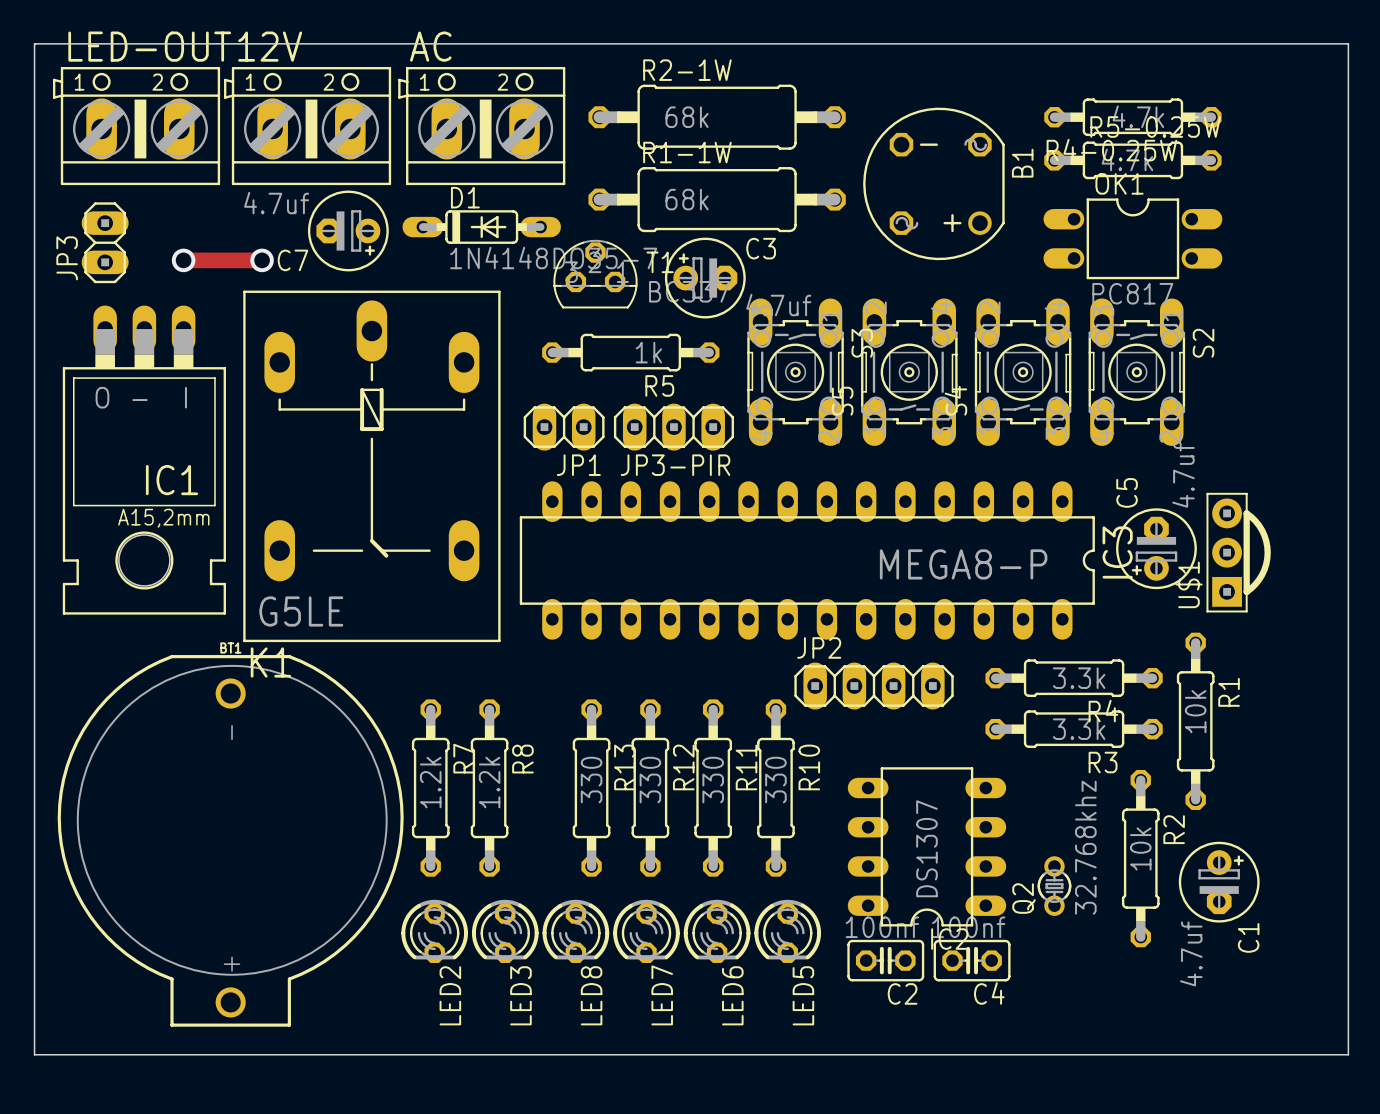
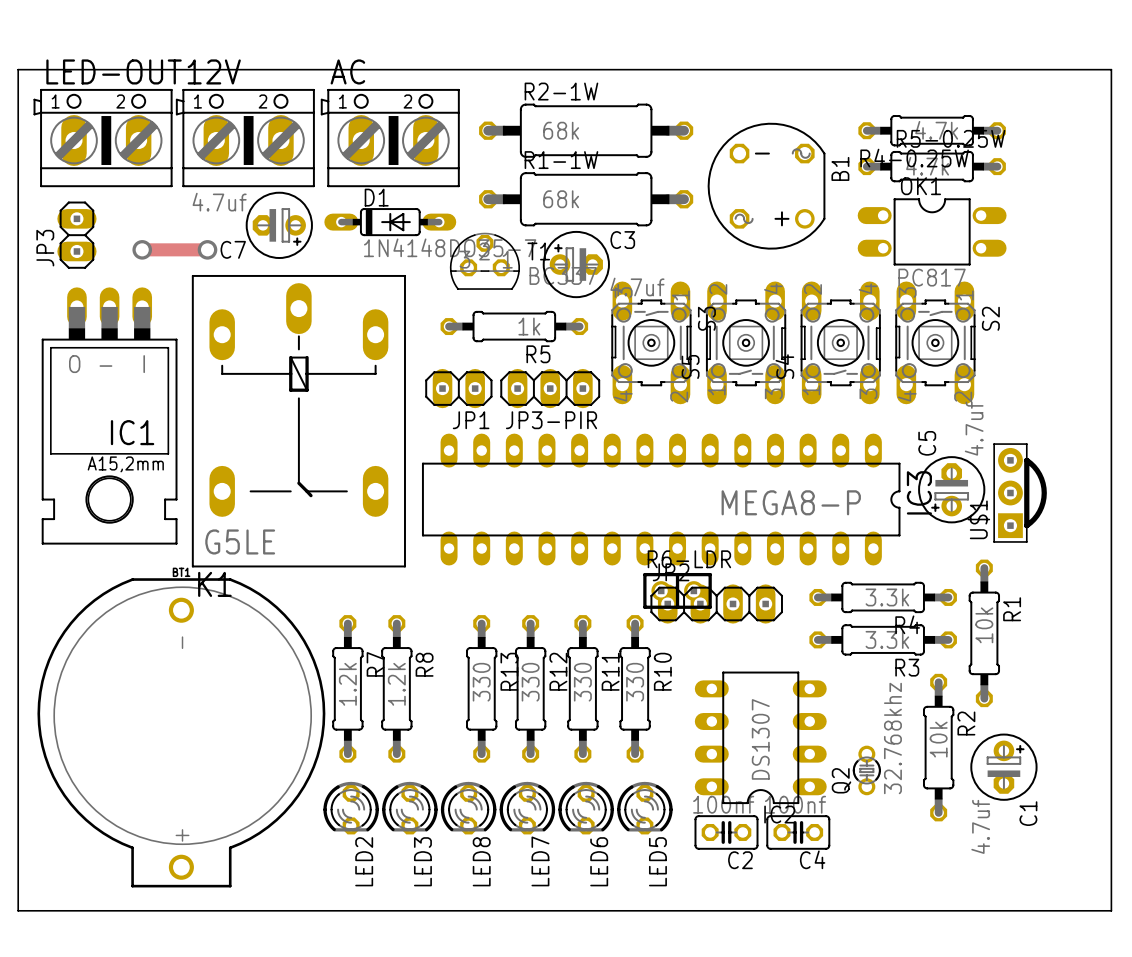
R6-LDR: none -> (677, 590)

